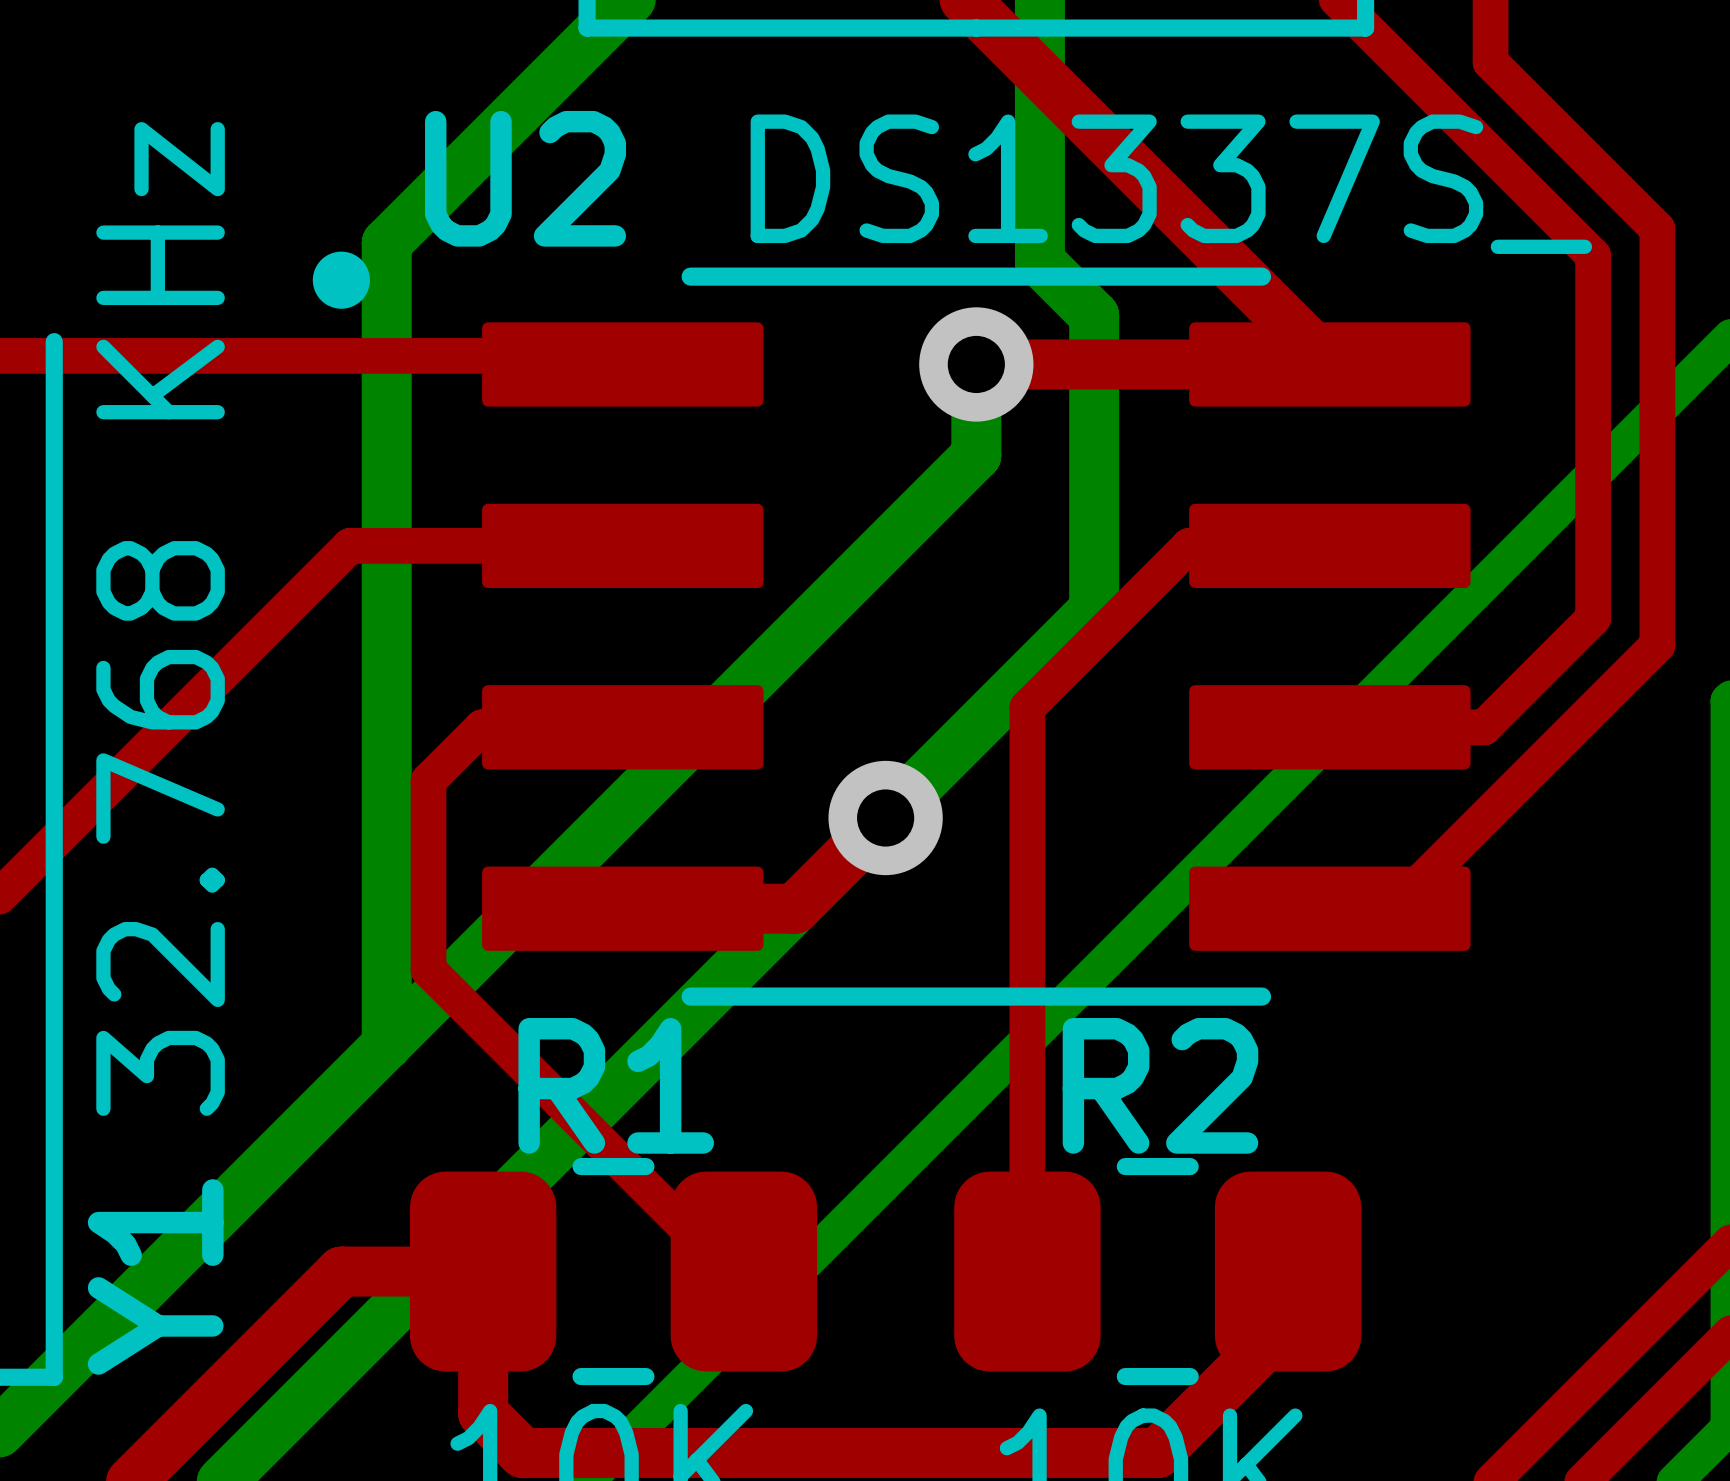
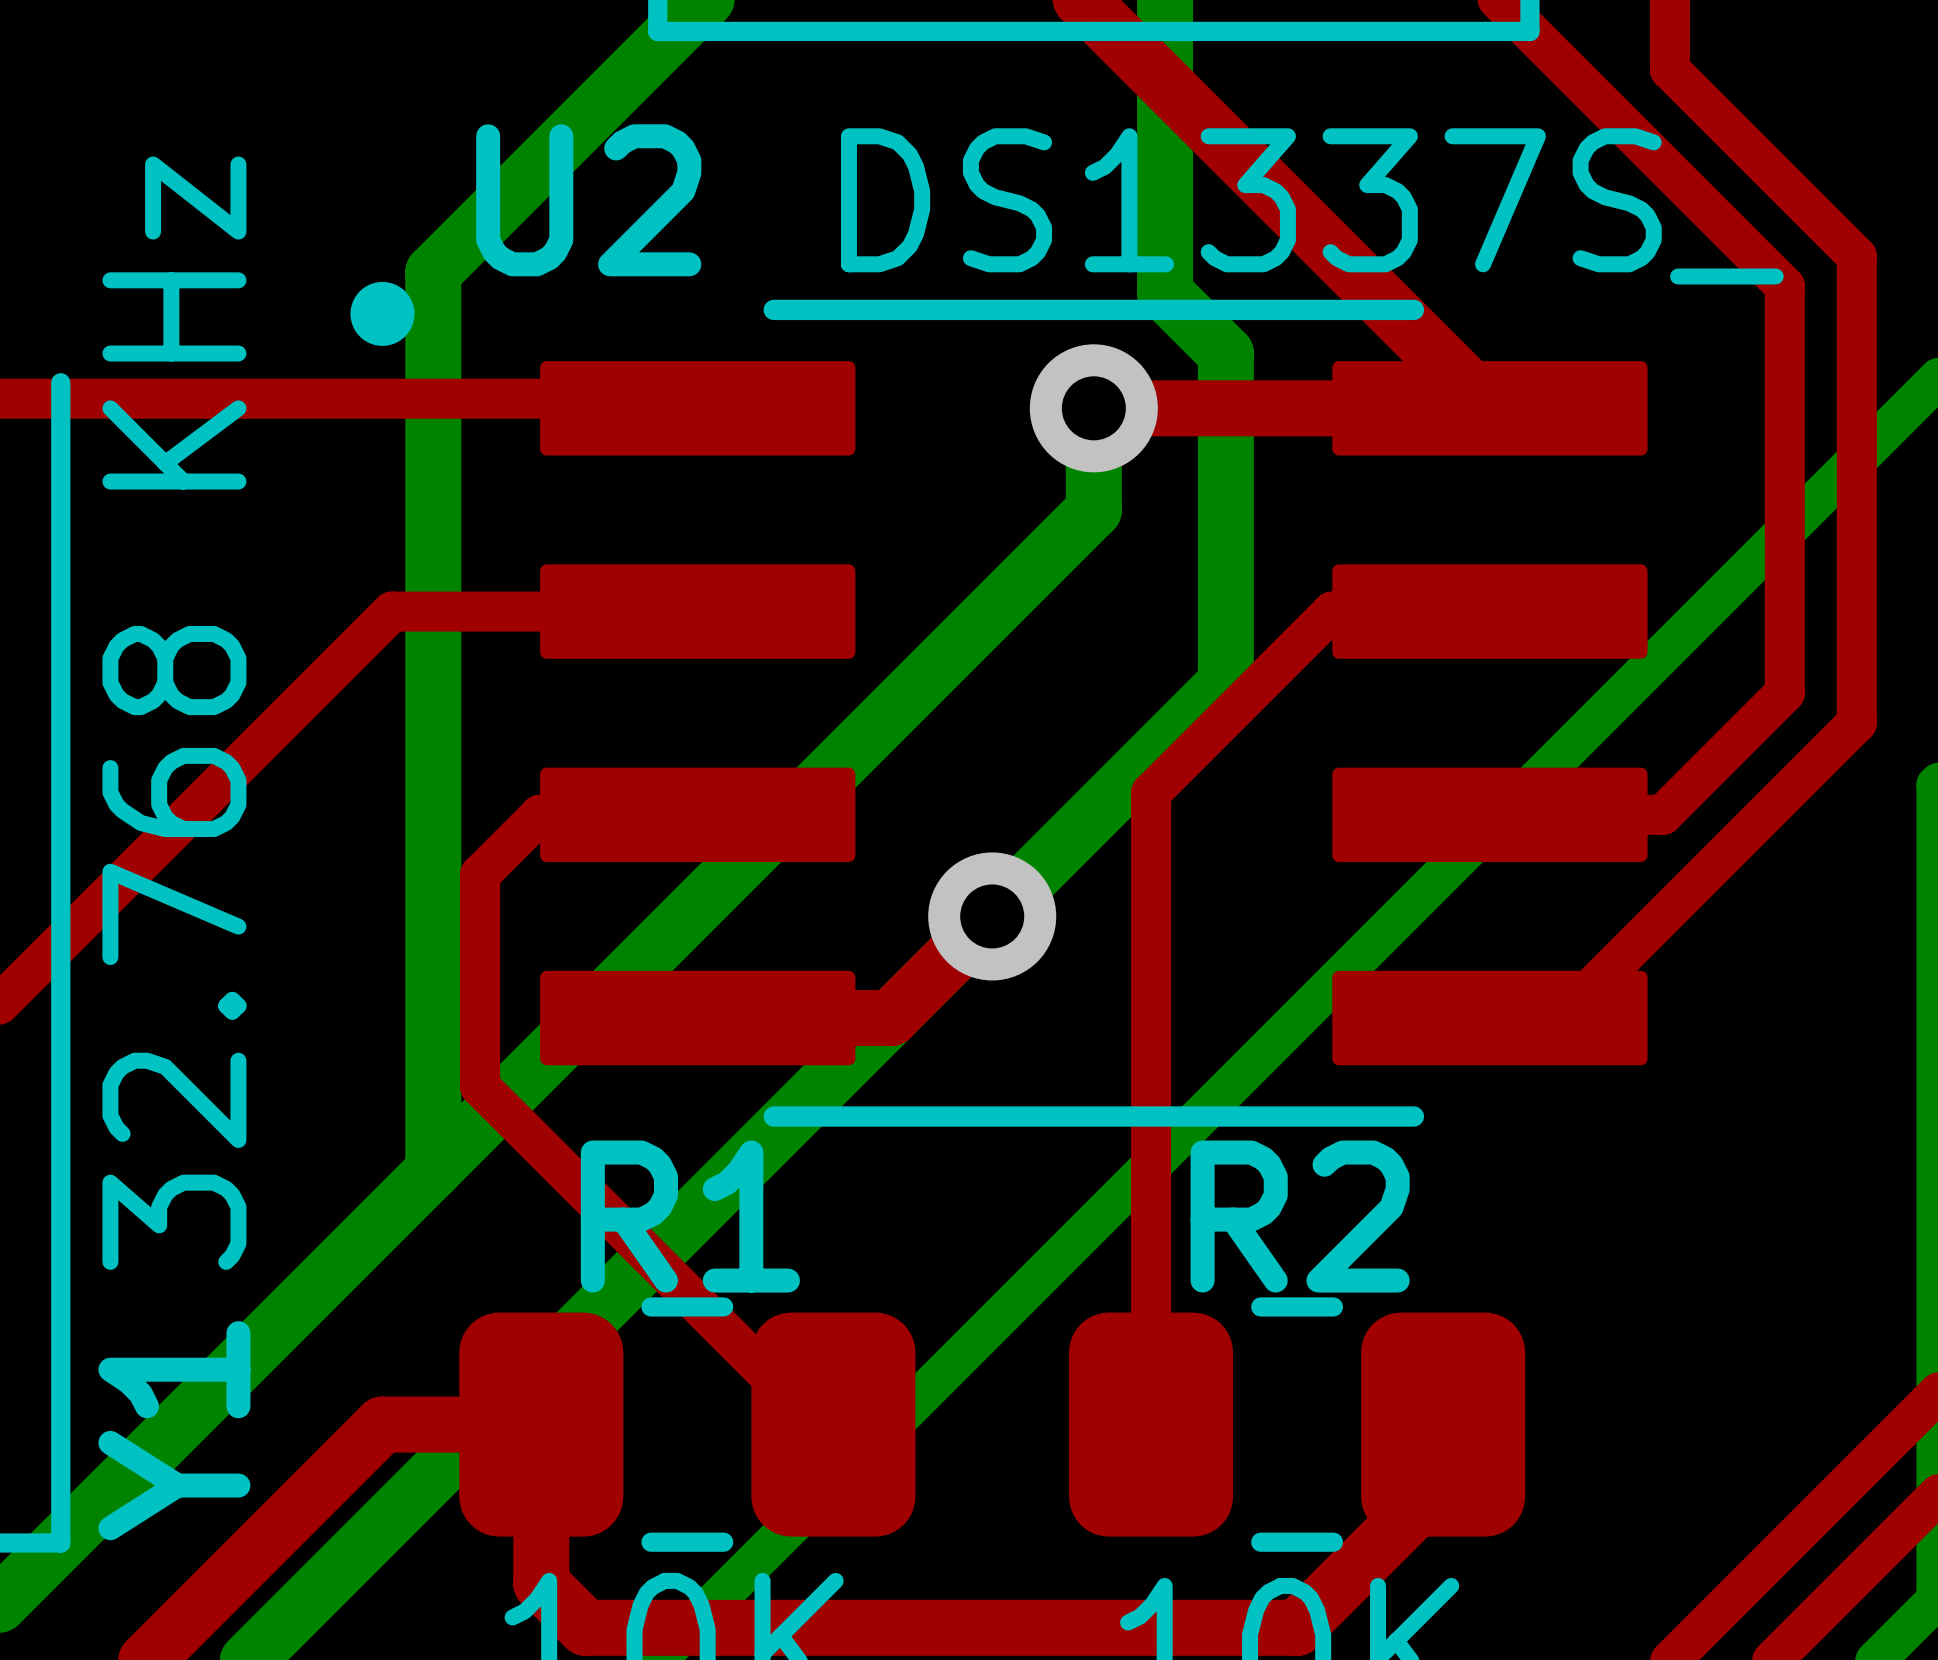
Y1 value position: 32.768 KHz (160, 618) -> 32.768 KHz (174, 713)

